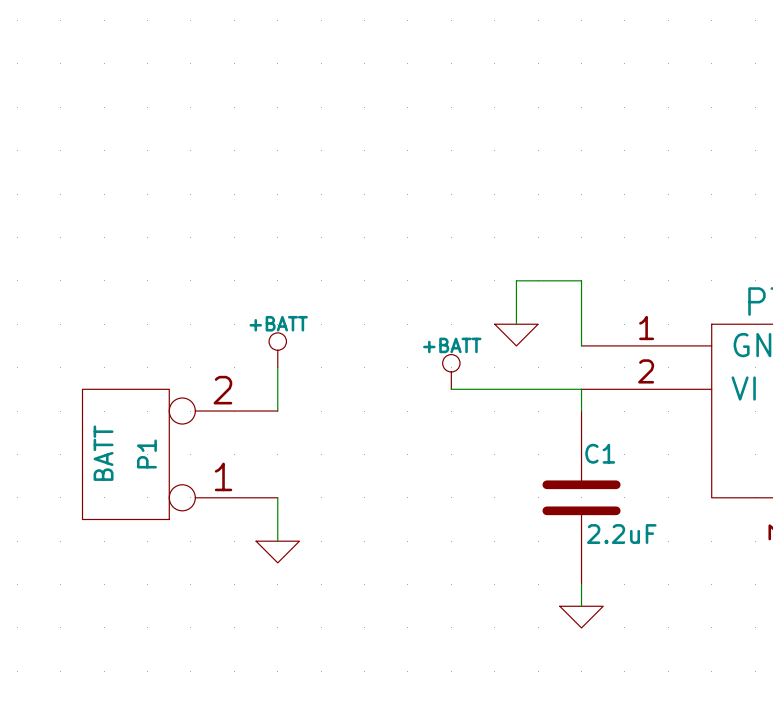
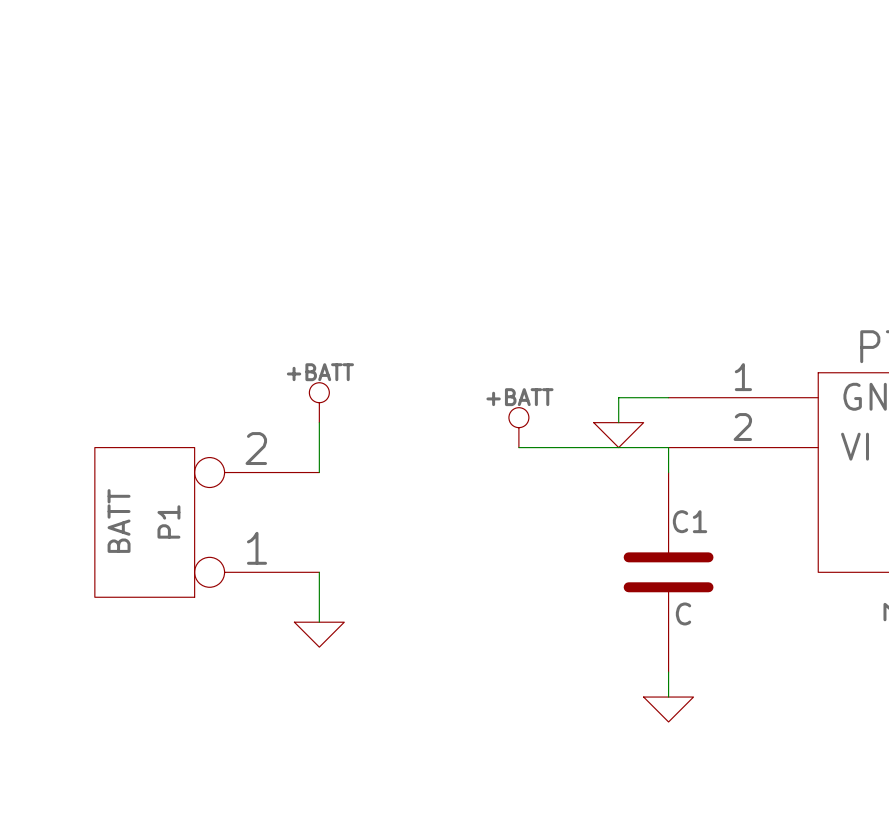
wire: (516, 324) (516, 280) (581, 280) (581, 345) -> (618, 422) (618, 397) (668, 397)
power symbol position: (516, 335) -> (618, 435)
C1 value: 2.2uF (621, 534) -> C (683, 613)

